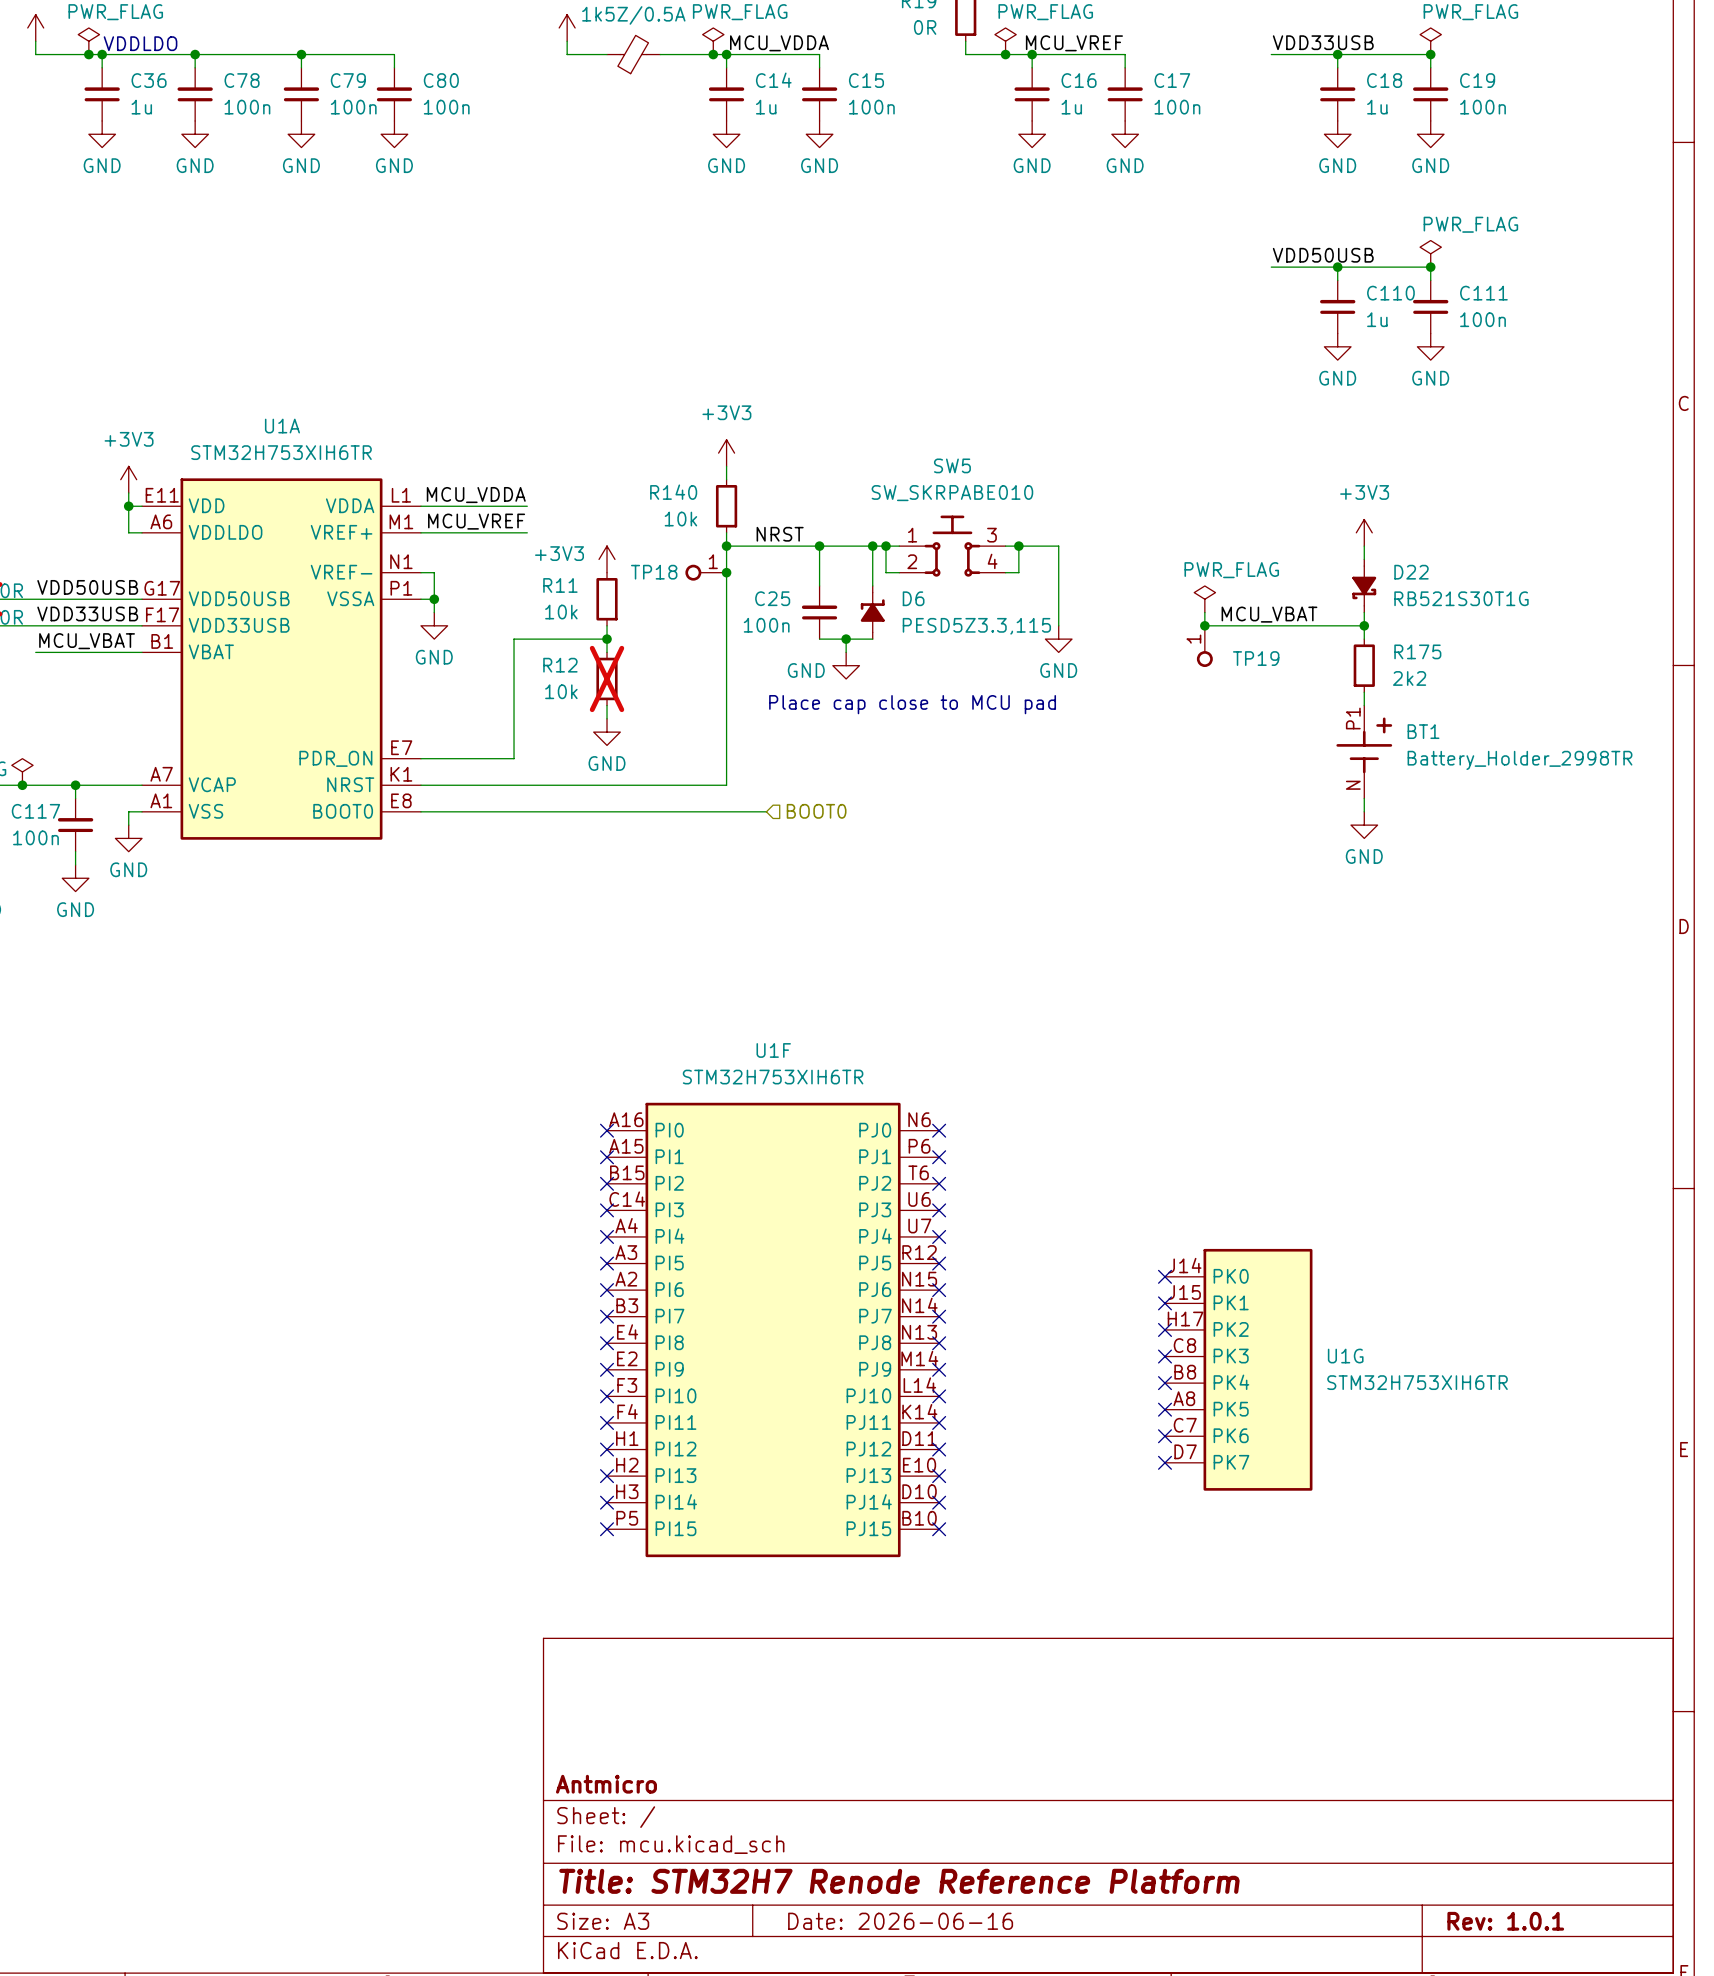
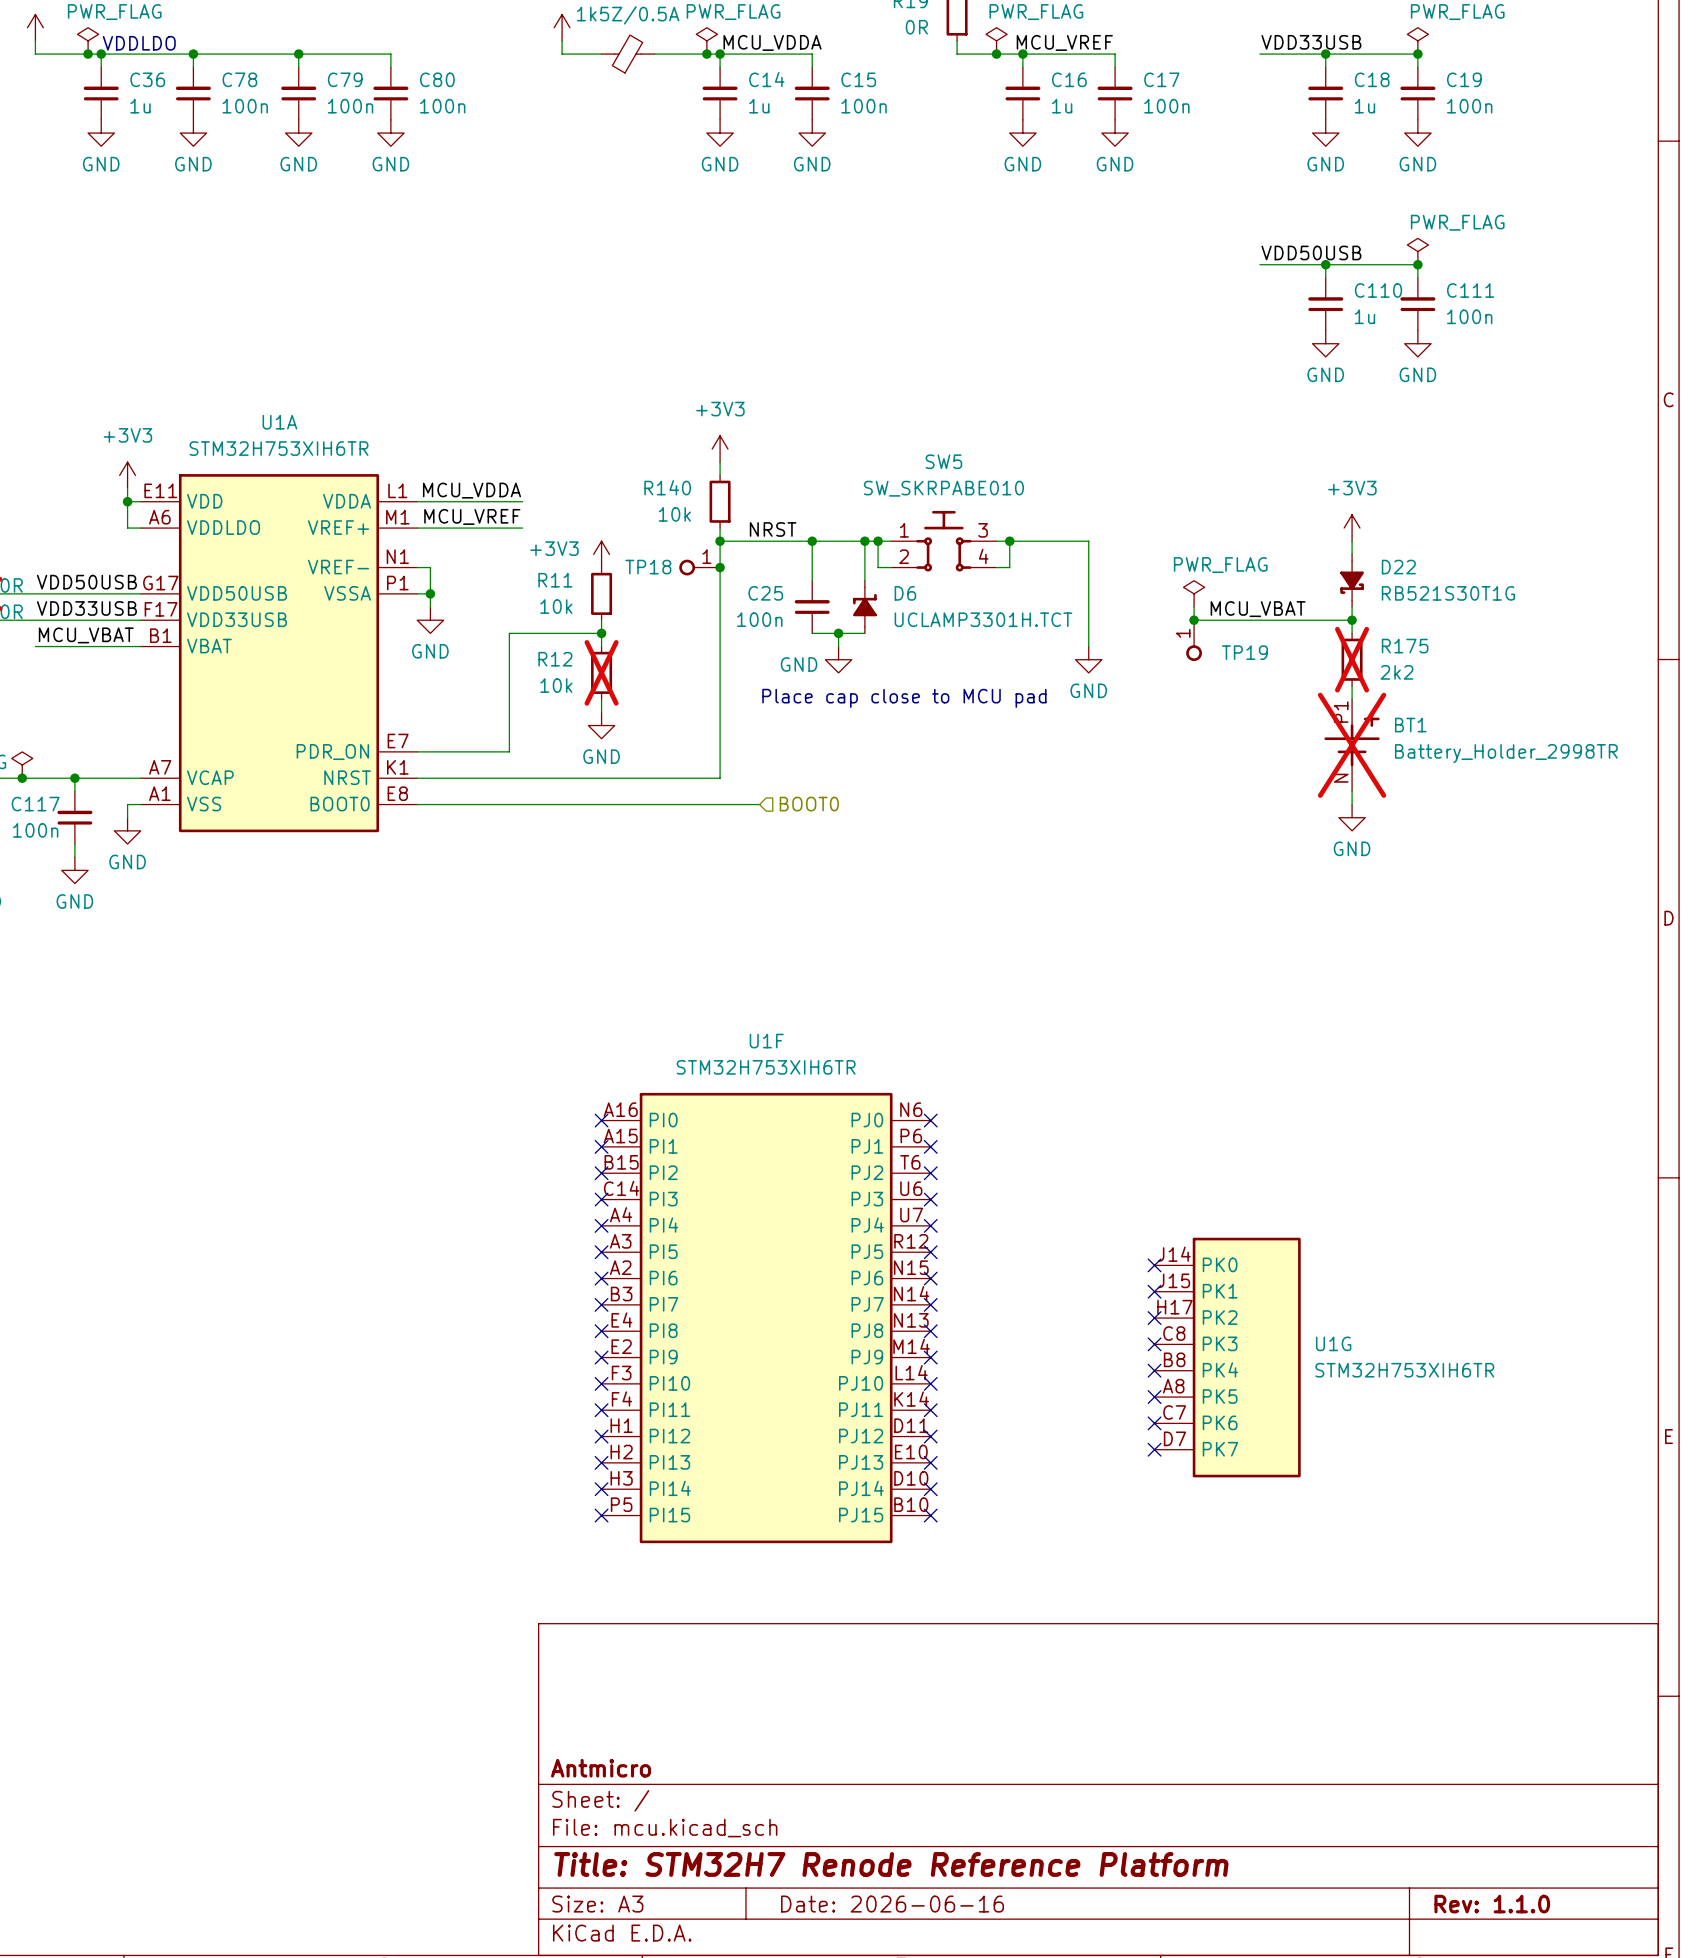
wire: (1058, 546) (1058, 625) -> (1049, 541) (1088, 541) (1088, 646)
D6 text: PESD5Z3.3,115 (976, 626) -> UCLAMP3301H.TCT (983, 619)
power symbol position: GND (1058, 639) -> GND (1088, 659)
R175 do-not-place cross: none -> (1352, 659)
BT1 do-not-place cross: none -> (1352, 745)
title block: Rev: 1.0.1 (1505, 1921) -> Rev: 1.1.0 (1492, 1904)

